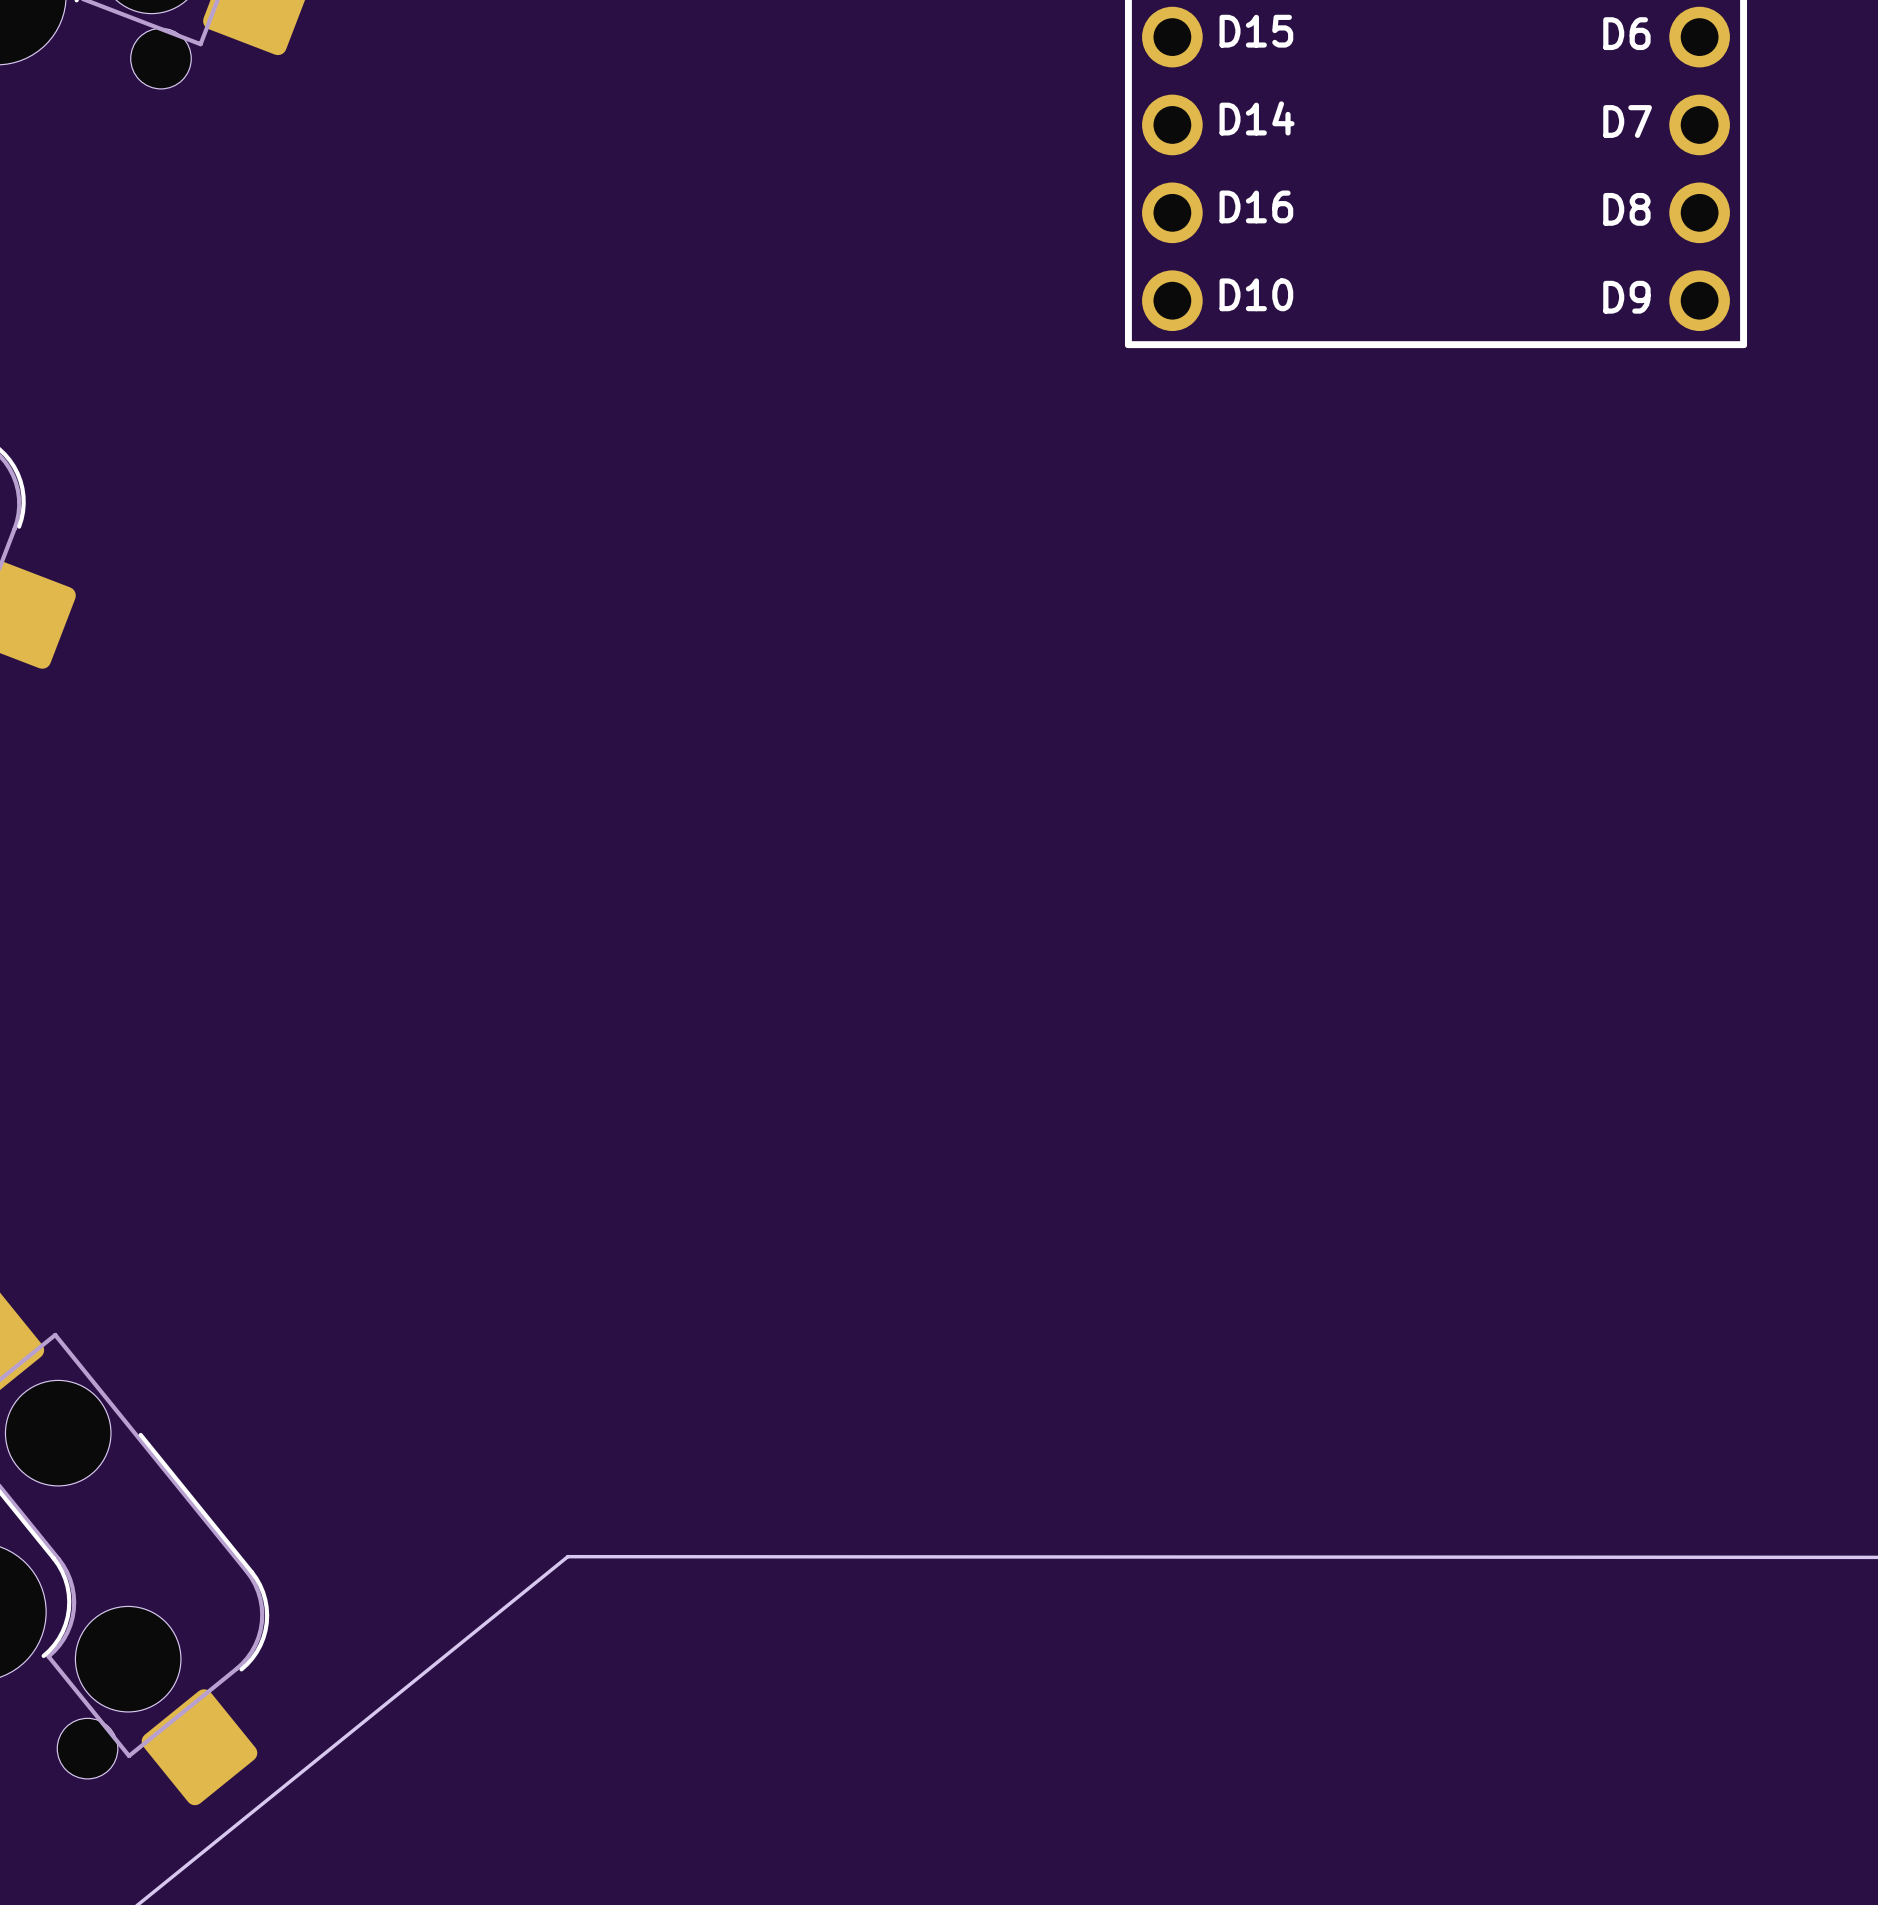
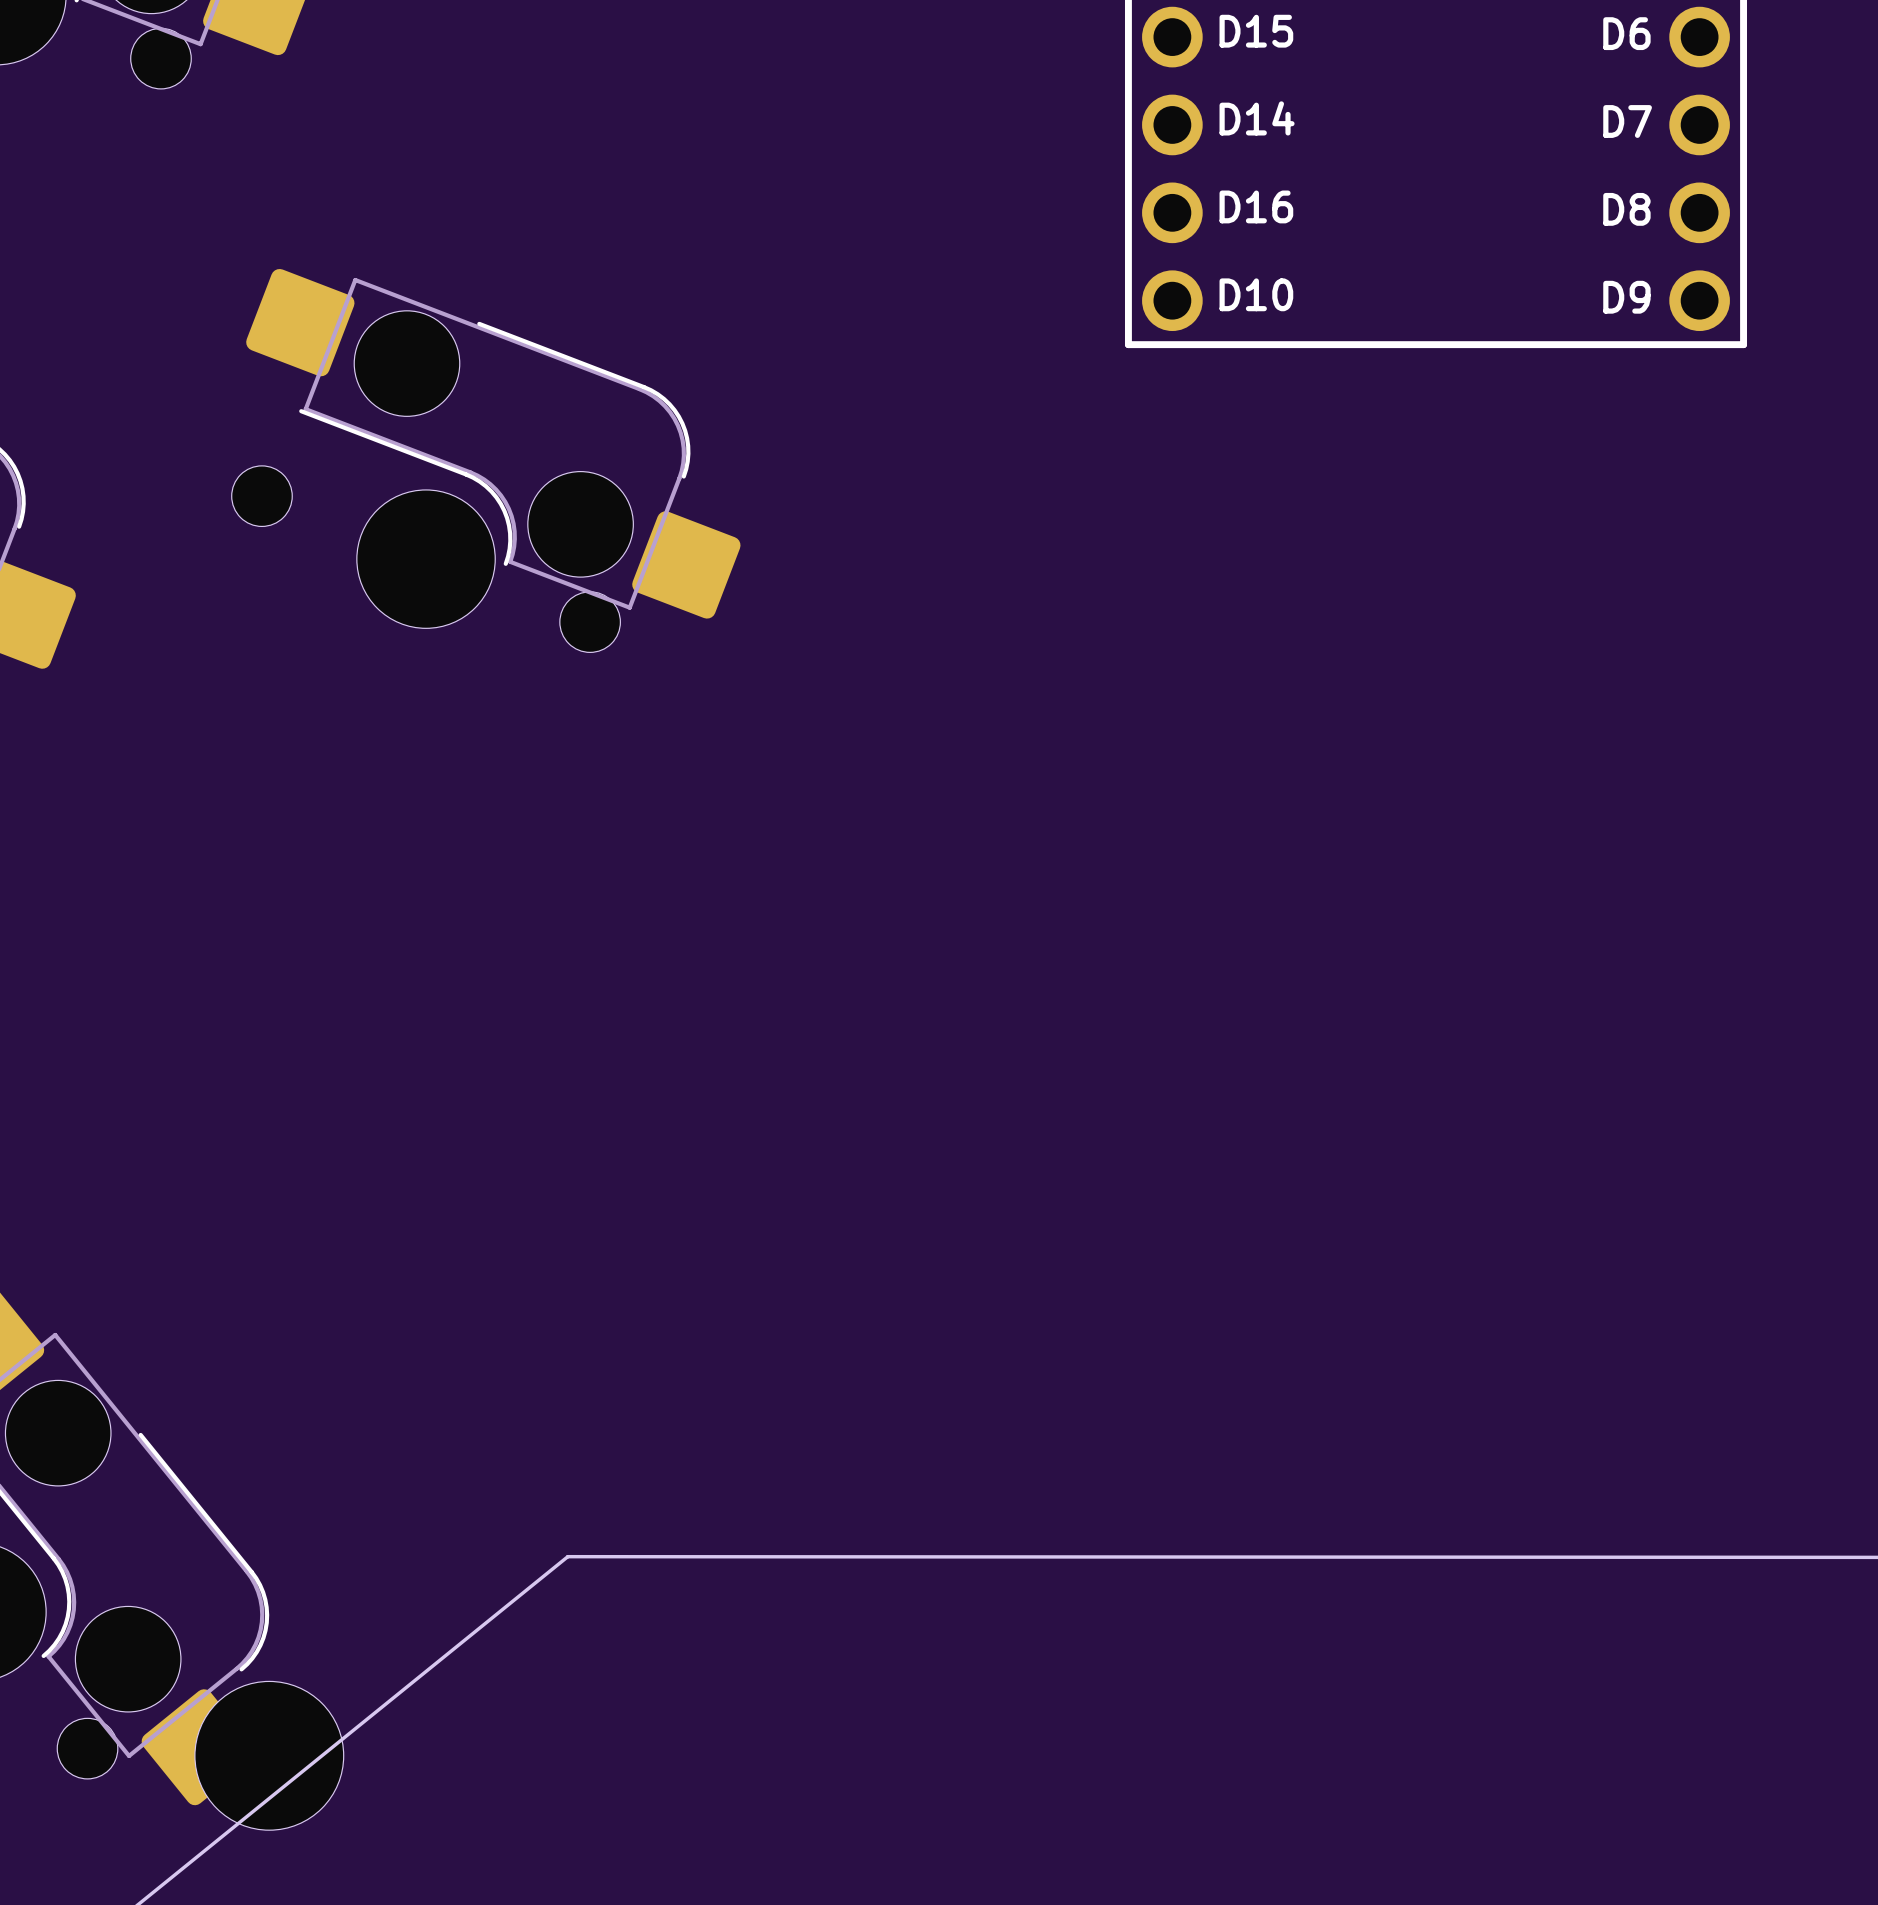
part: none -> (486, 460)
part: none -> (269, 1755)

